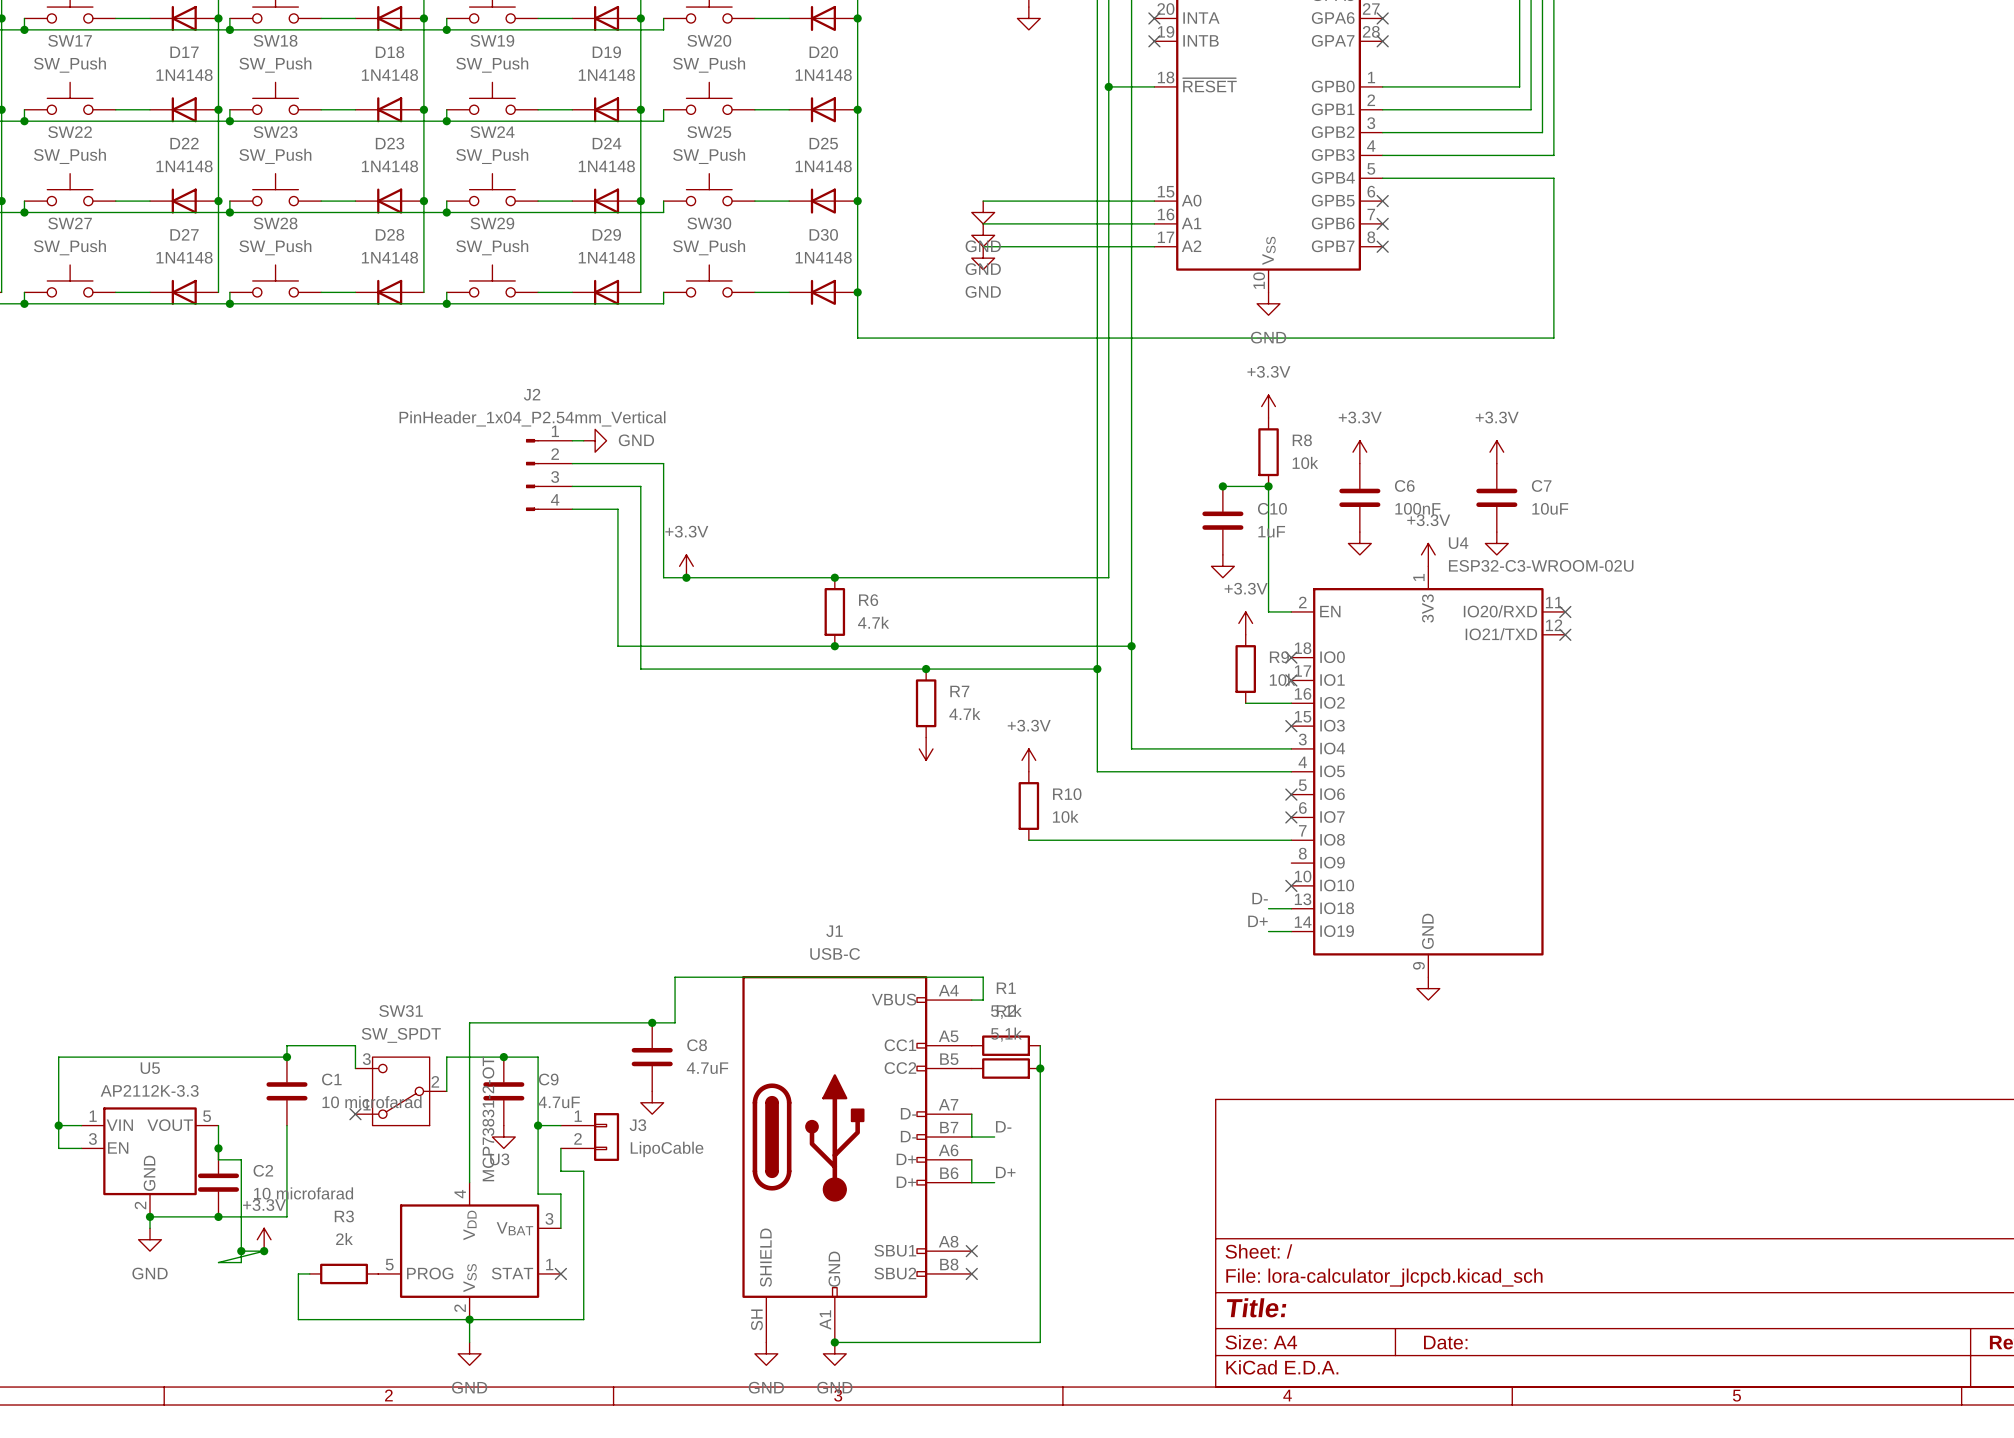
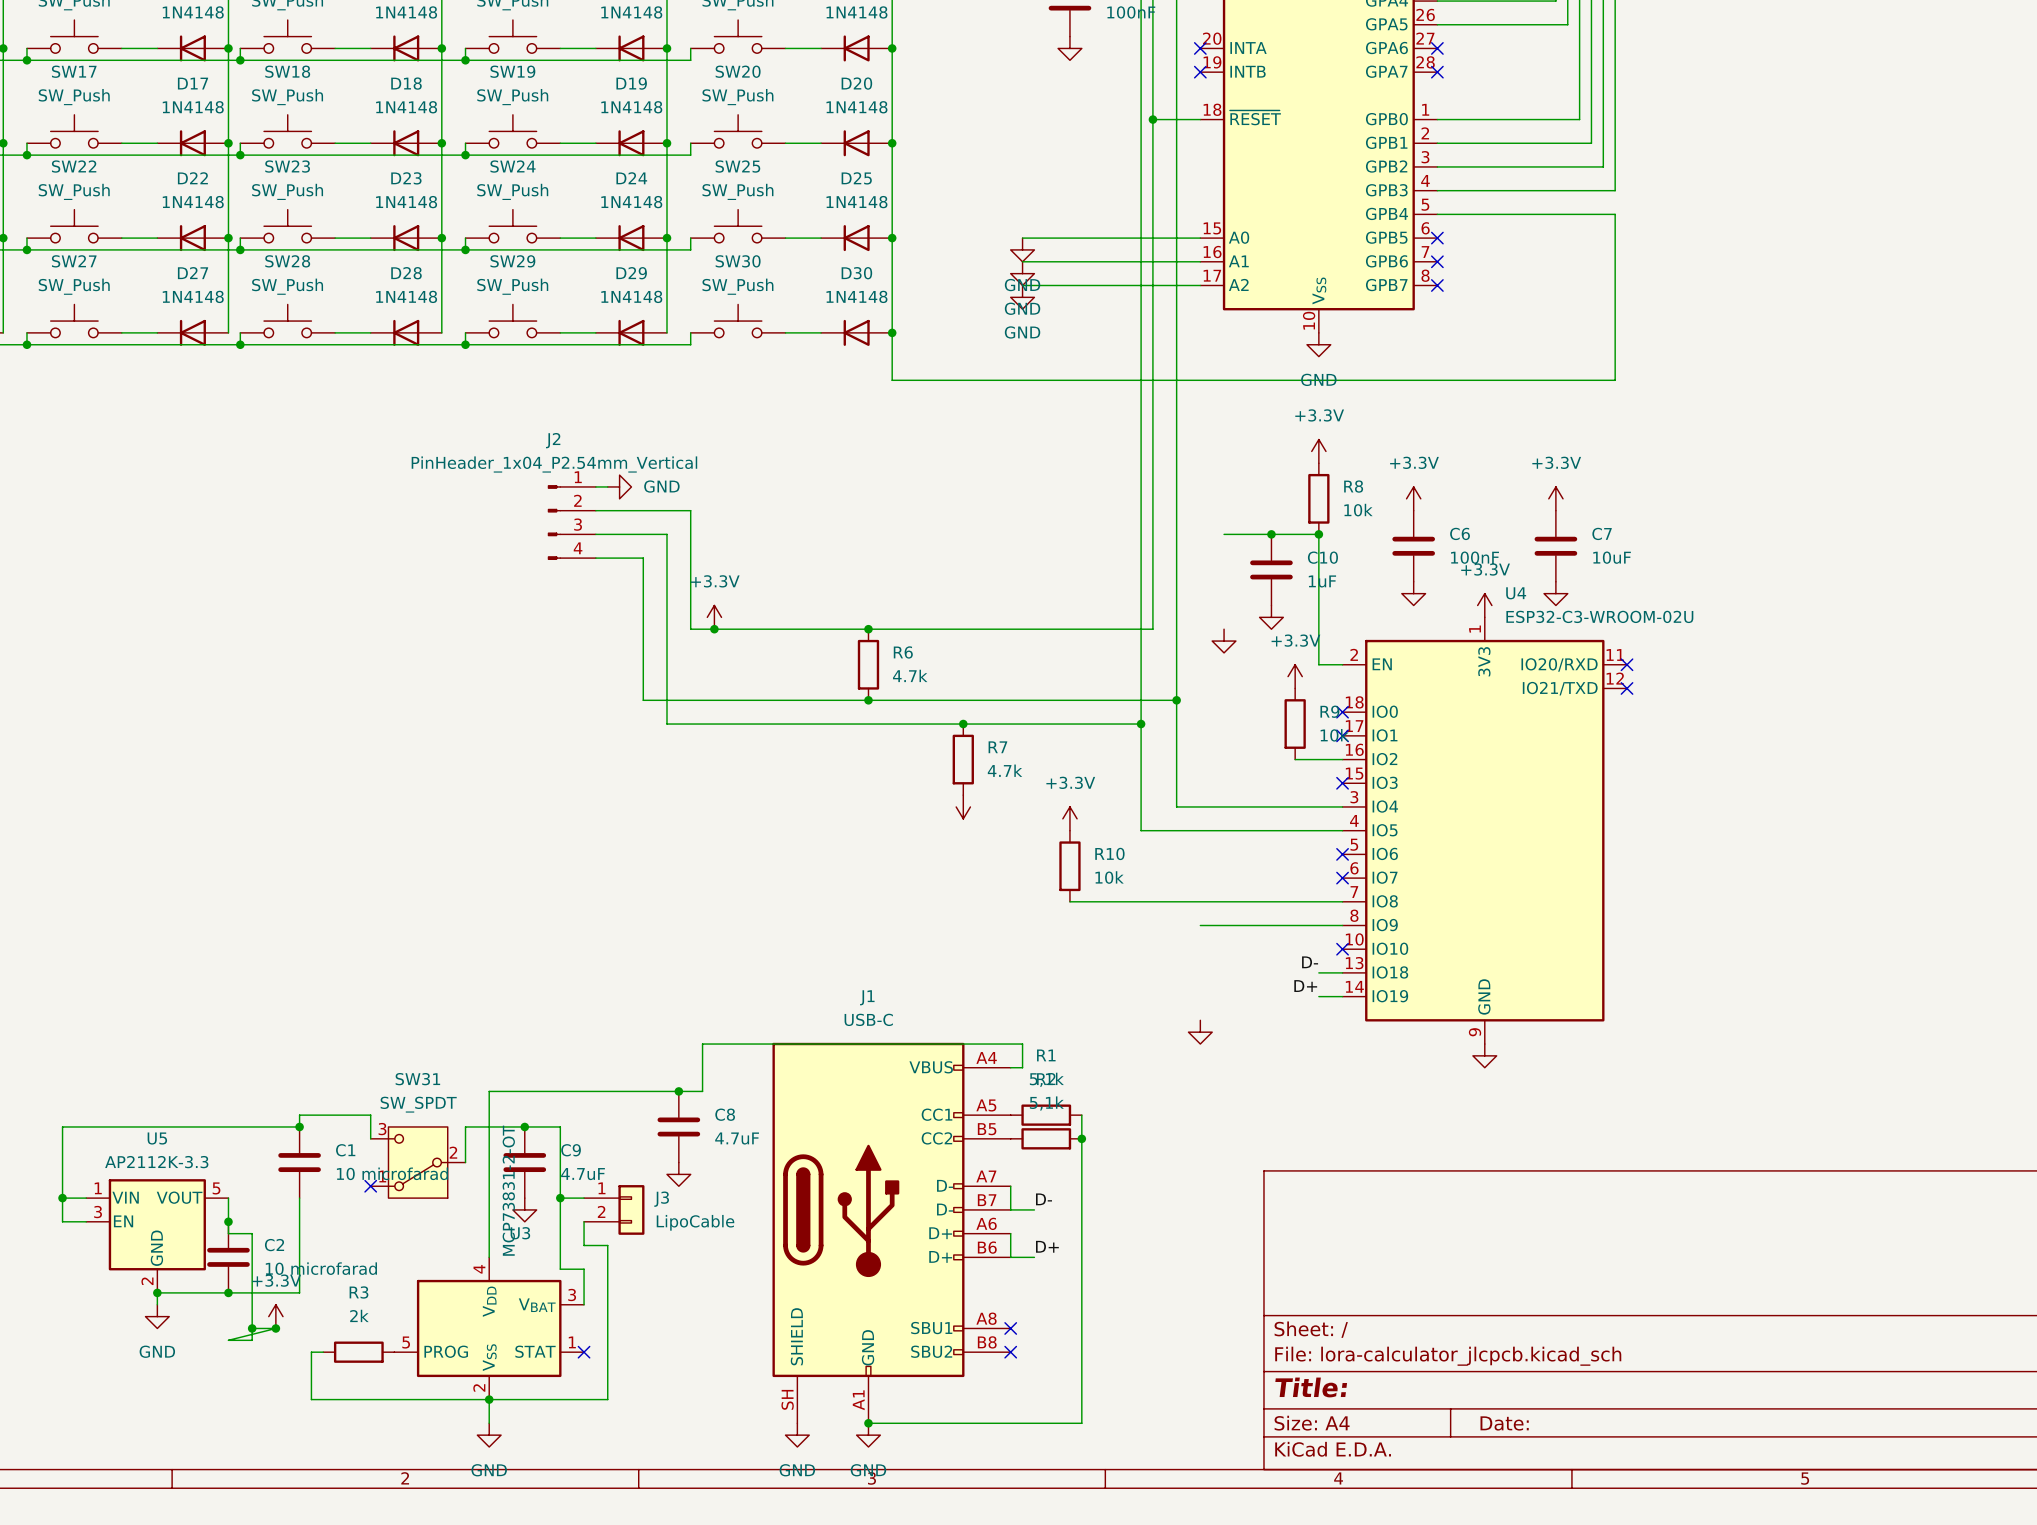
wire: none -> (1224, 534) (1271, 534)
power symbol: none -> (1224, 641)
wire: none -> (1200, 925) (1342, 925)
power symbol: none -> (1200, 1032)

